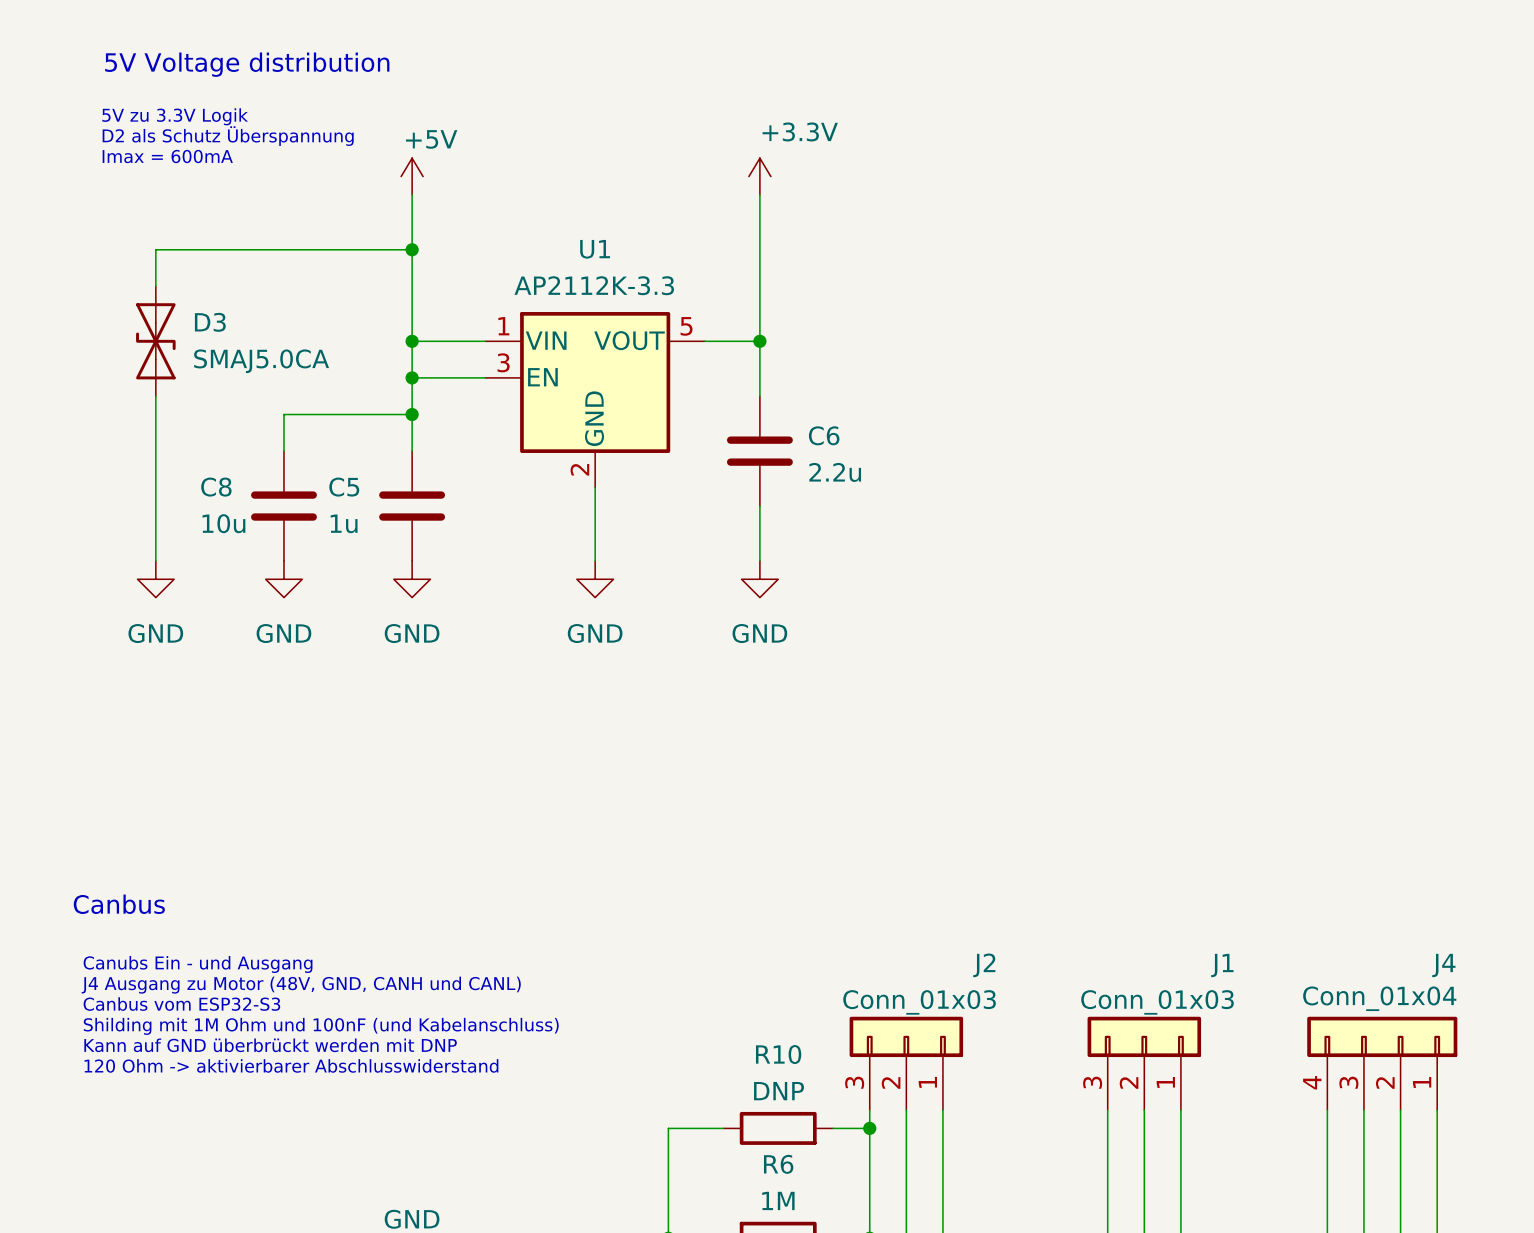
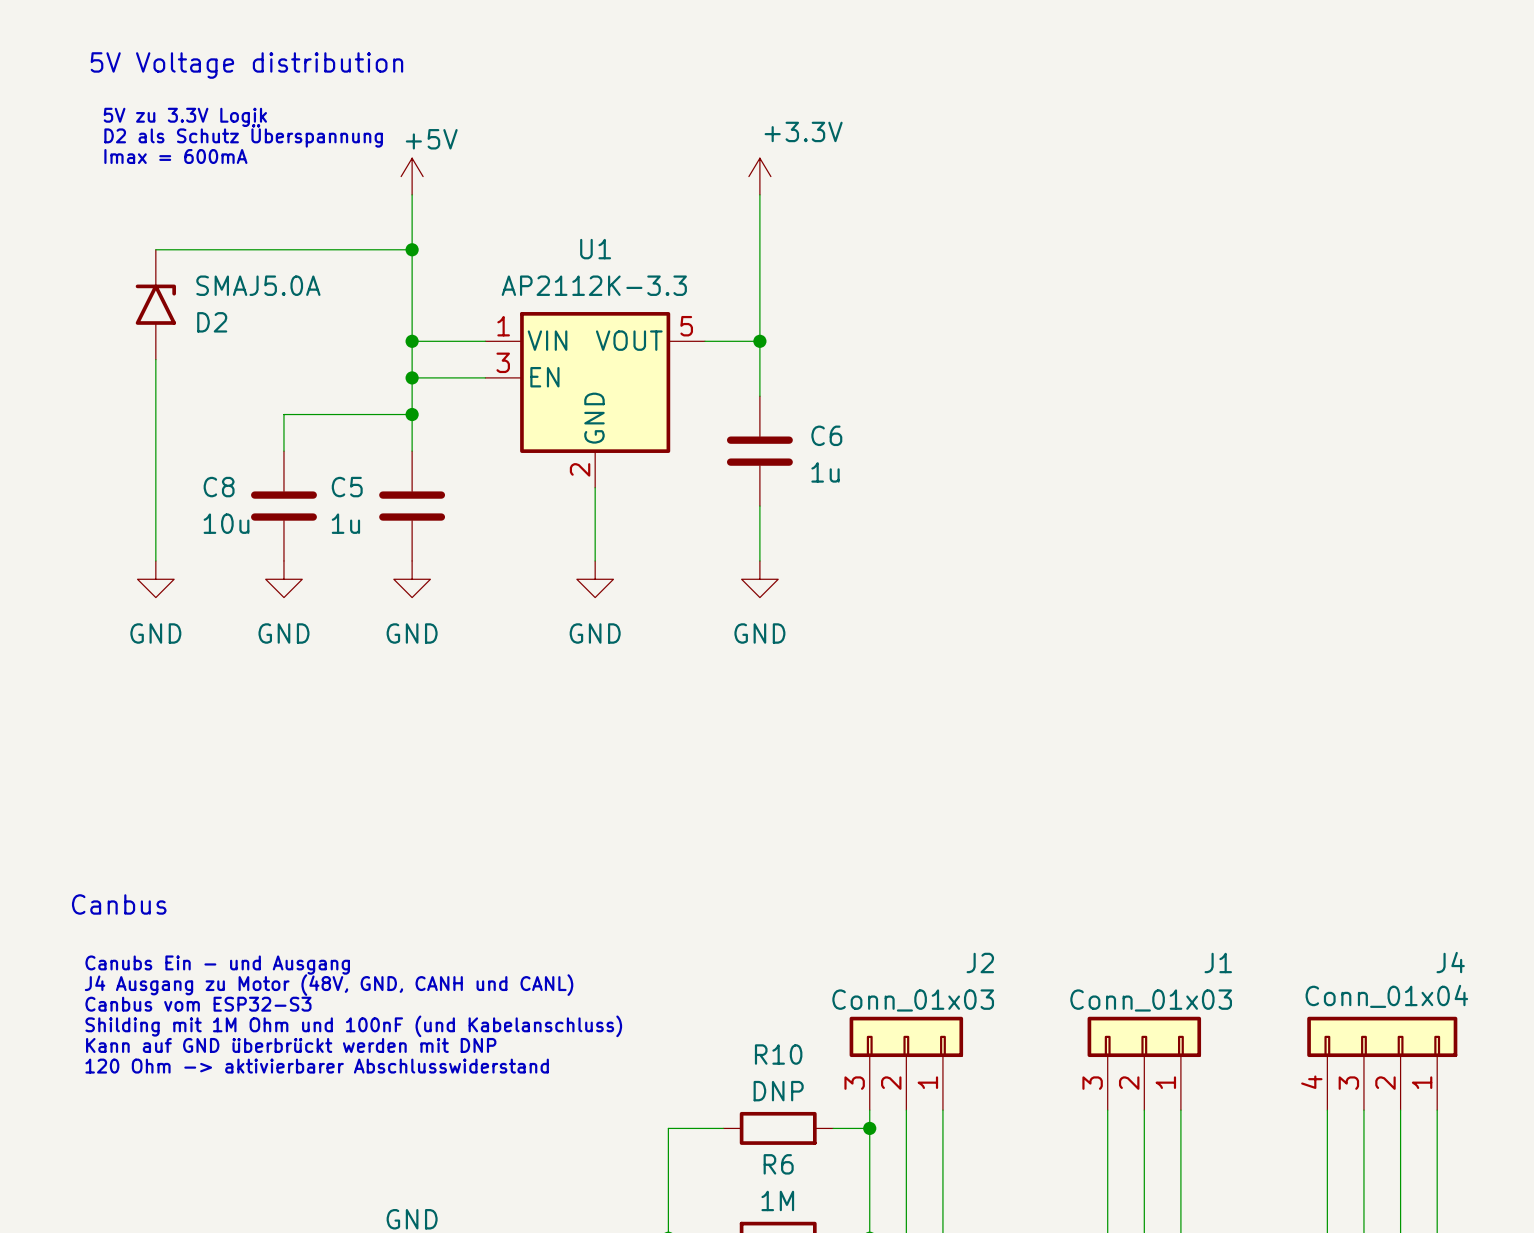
D2: none -> SMAJ5.0A (155, 304)
D3: SMAJ5.0CA (155, 341) -> none
C6 value: 2.2u (835, 472) -> 1u (825, 472)

